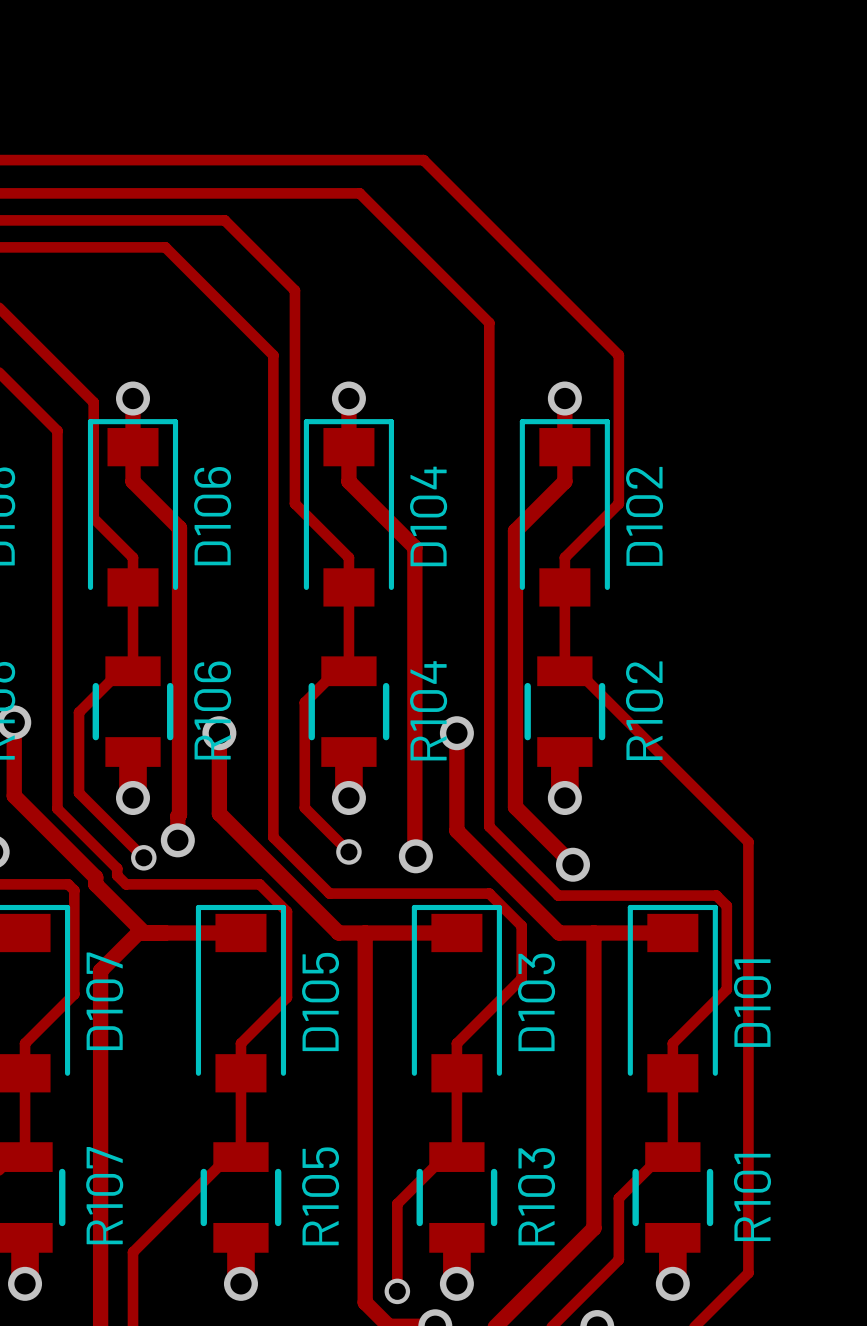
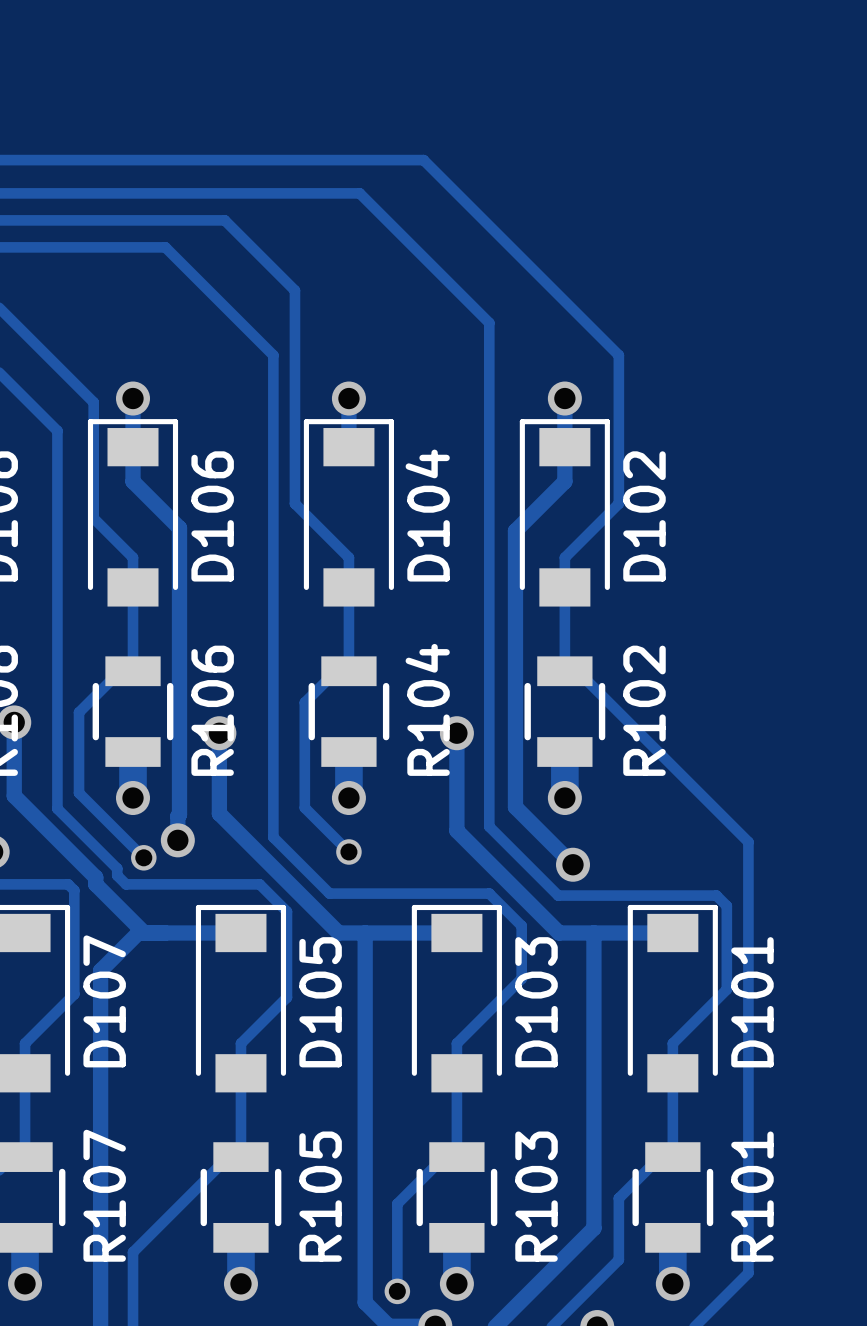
track: (348, 447) (348, 481) (414, 547) (415, 856) -> none
via: (415, 856) -> none

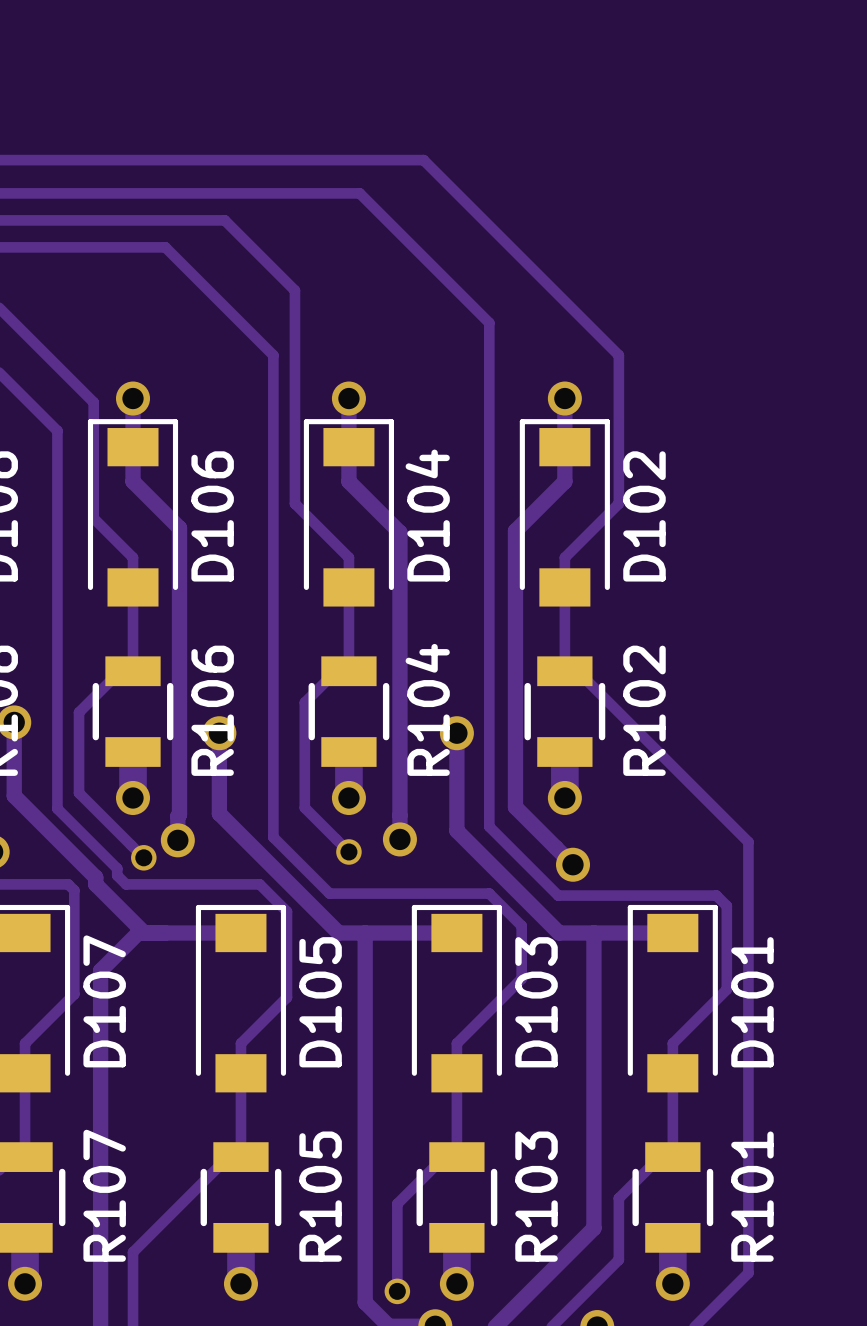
track: none -> (348, 447) (348, 481) (399, 532) (399, 839)
via: none -> (399, 839)

